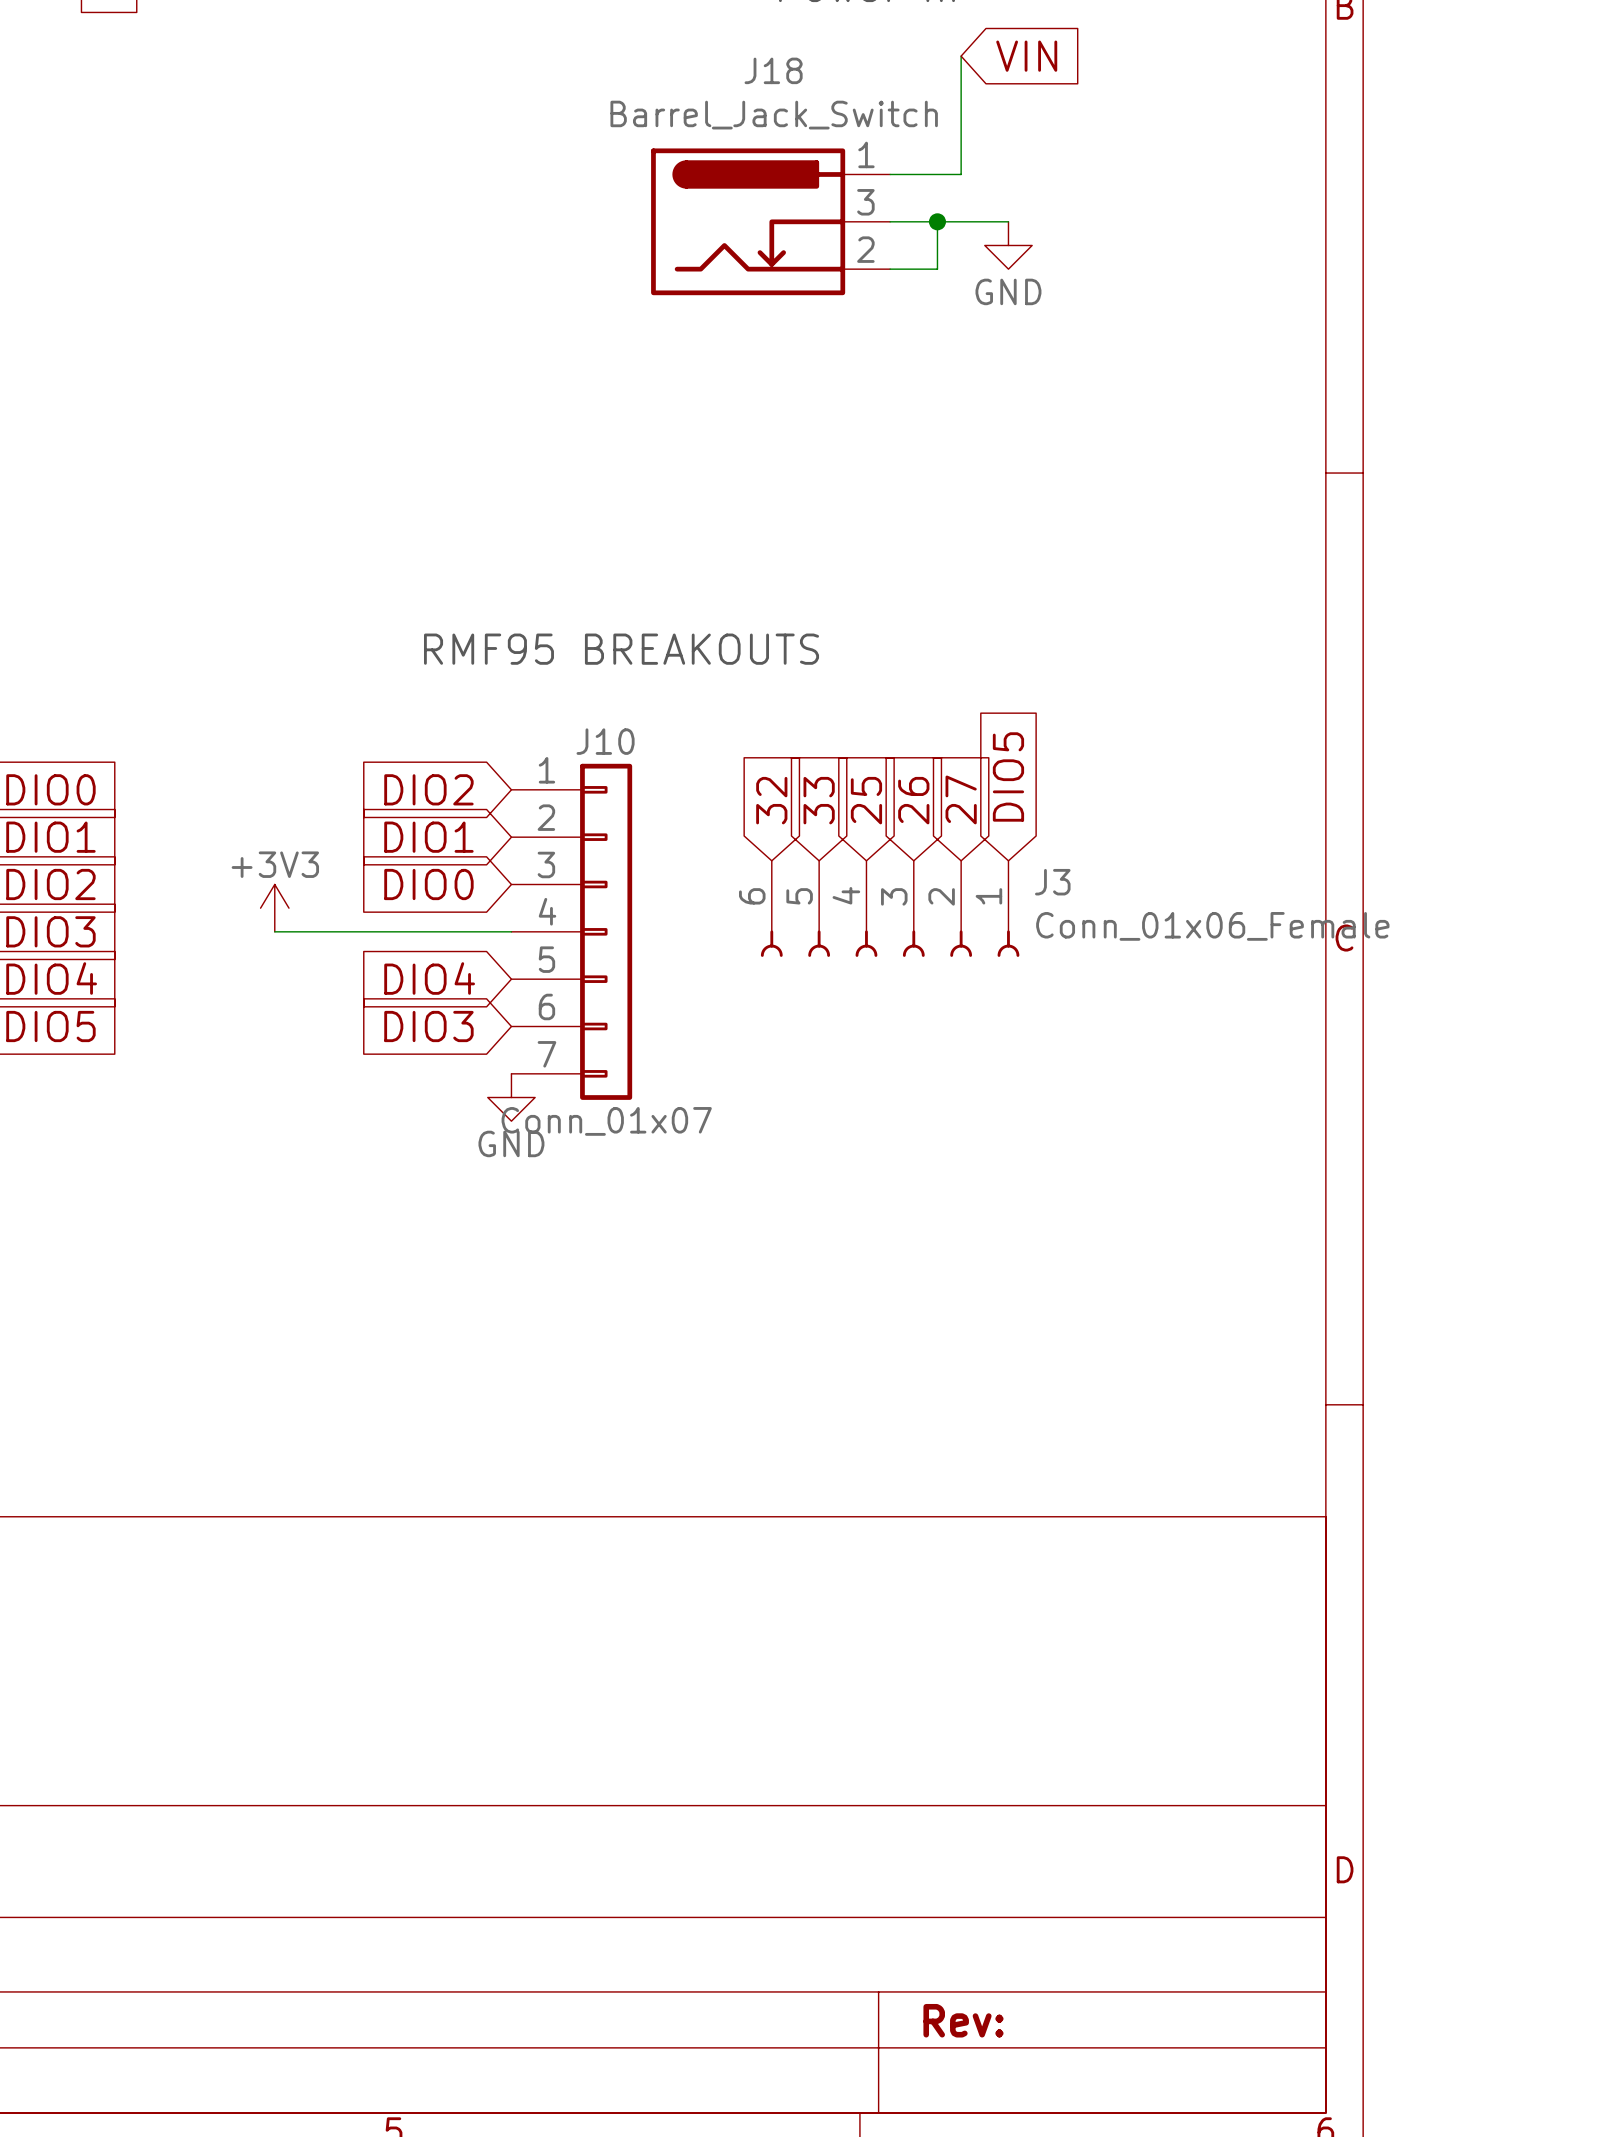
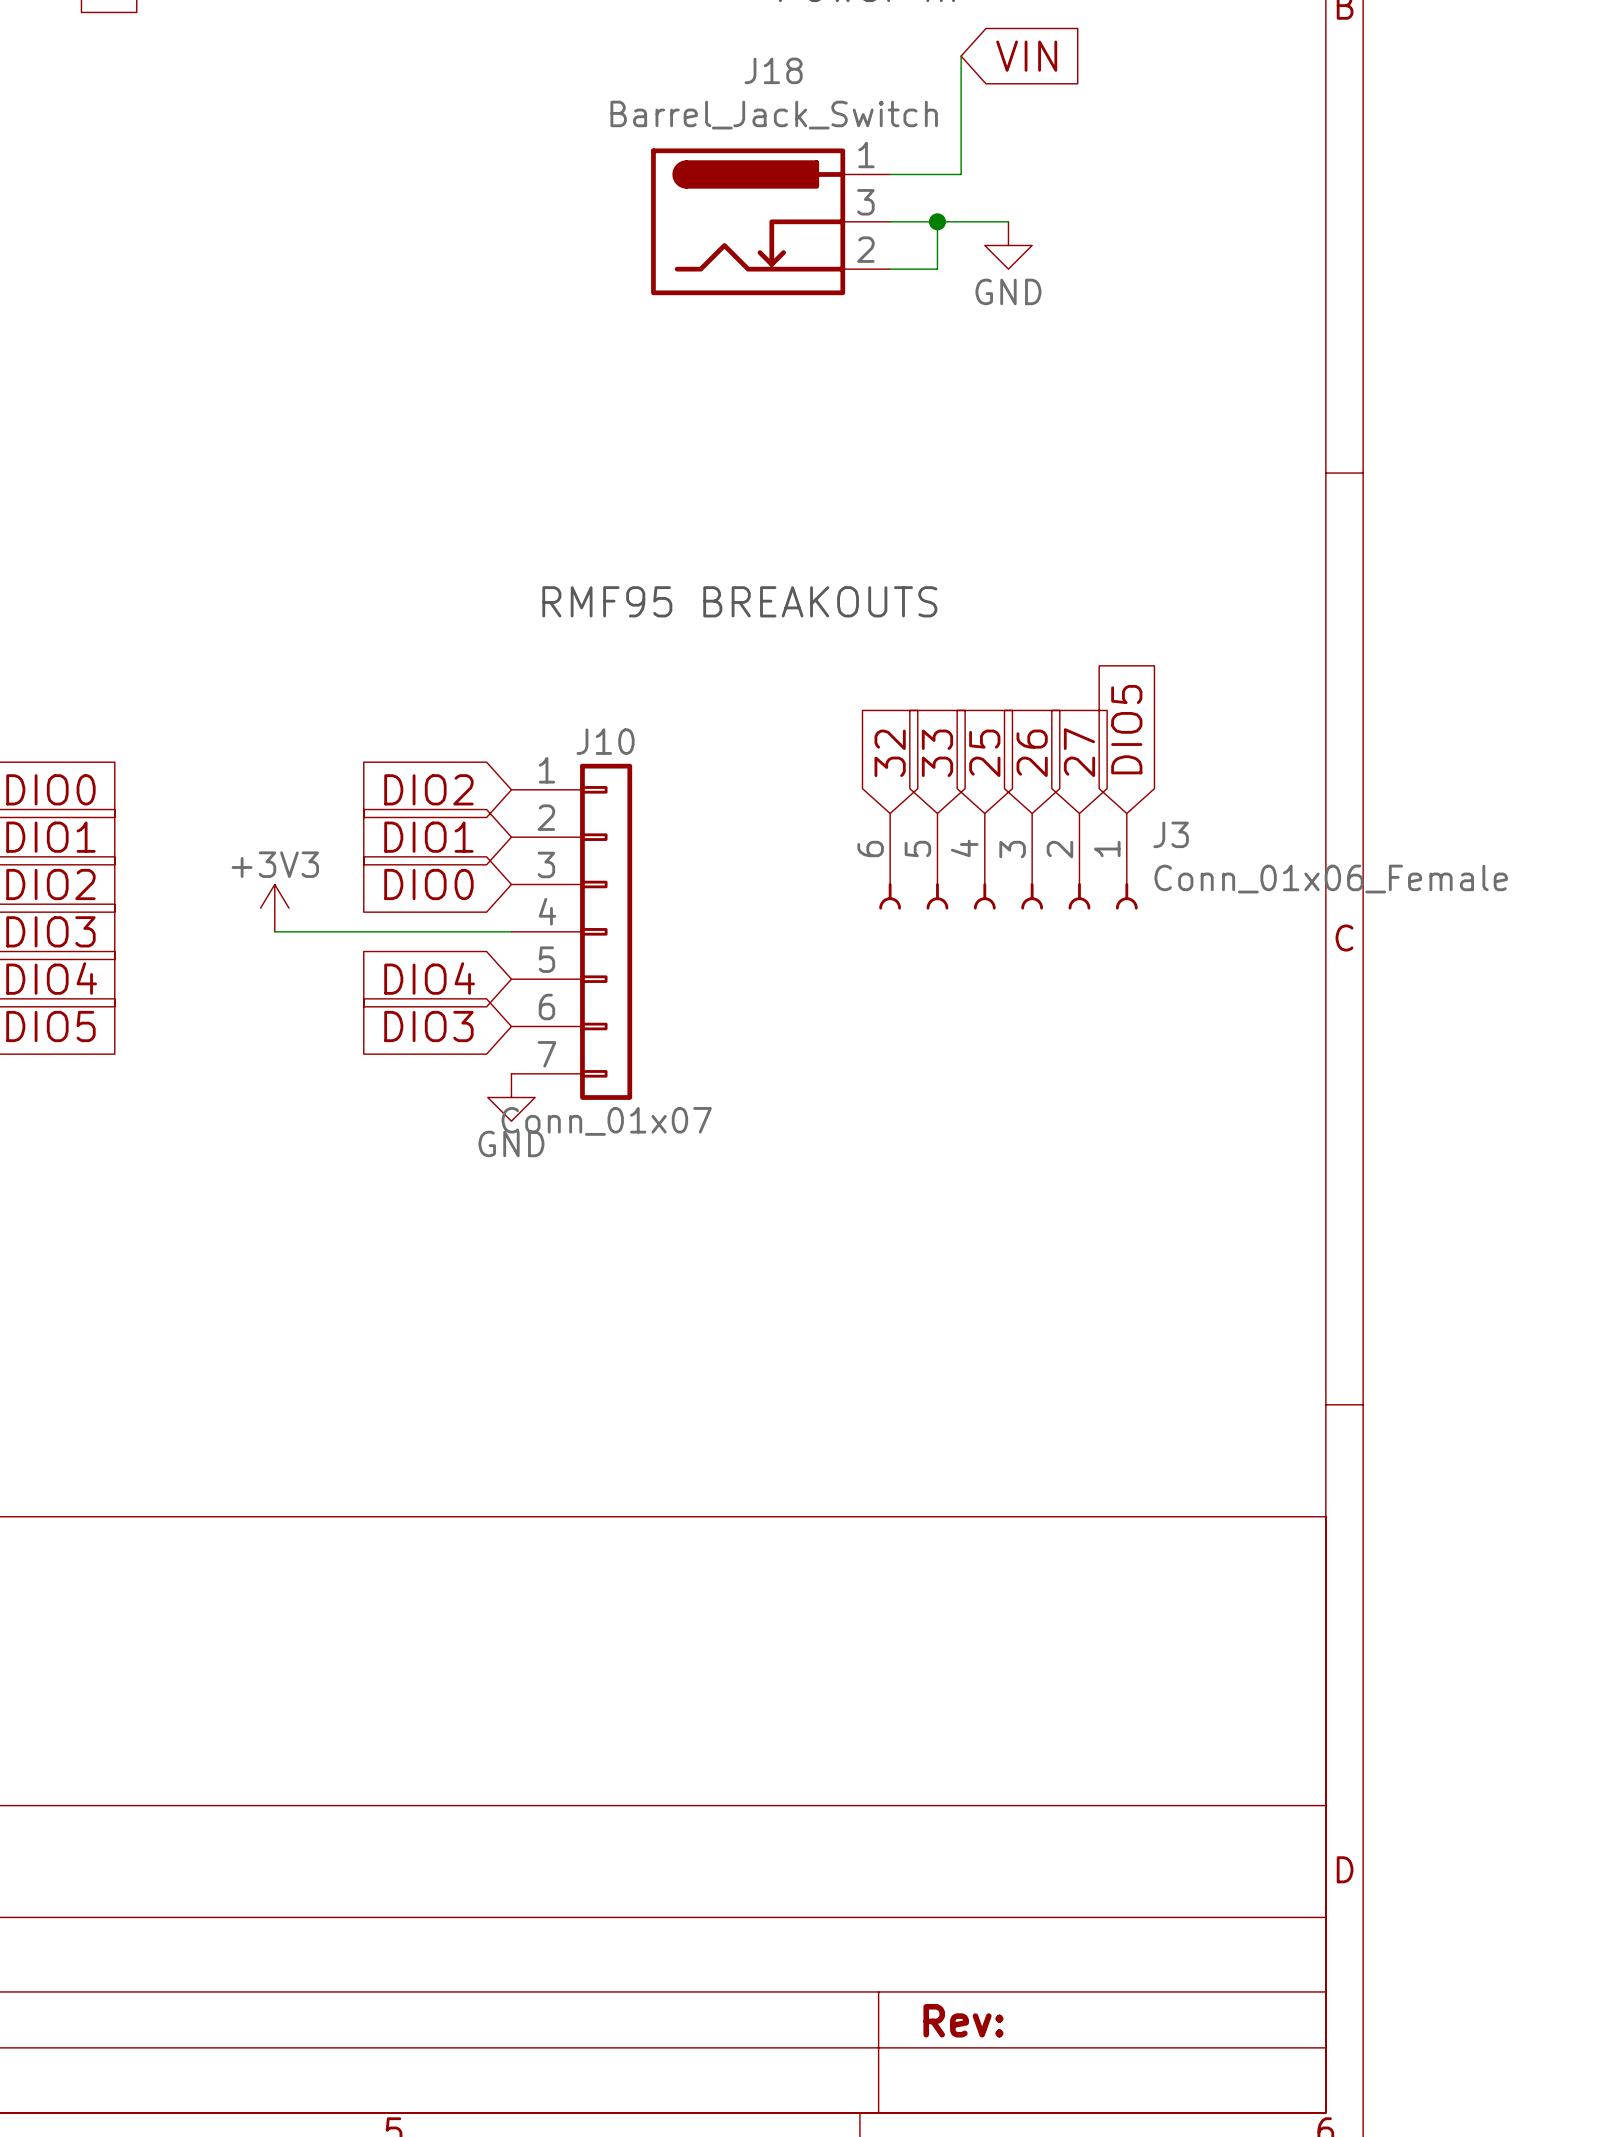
text position: RMF95 BREAKOUTS (621, 649) -> RMF95 BREAKOUTS (739, 601)
global label position: DIO5 (1008, 776) -> DIO5 (1126, 729)
global label position: 27 (961, 799) -> 27 (1079, 752)
global label position: 32 (771, 800) -> 32 (890, 753)
global label position: 33 (819, 800) -> 33 (937, 753)
global label position: 25 (866, 800) -> 25 (984, 753)
global label position: 26 (913, 800) -> 26 (1032, 753)
J3 position: (890, 908) -> (1008, 861)

